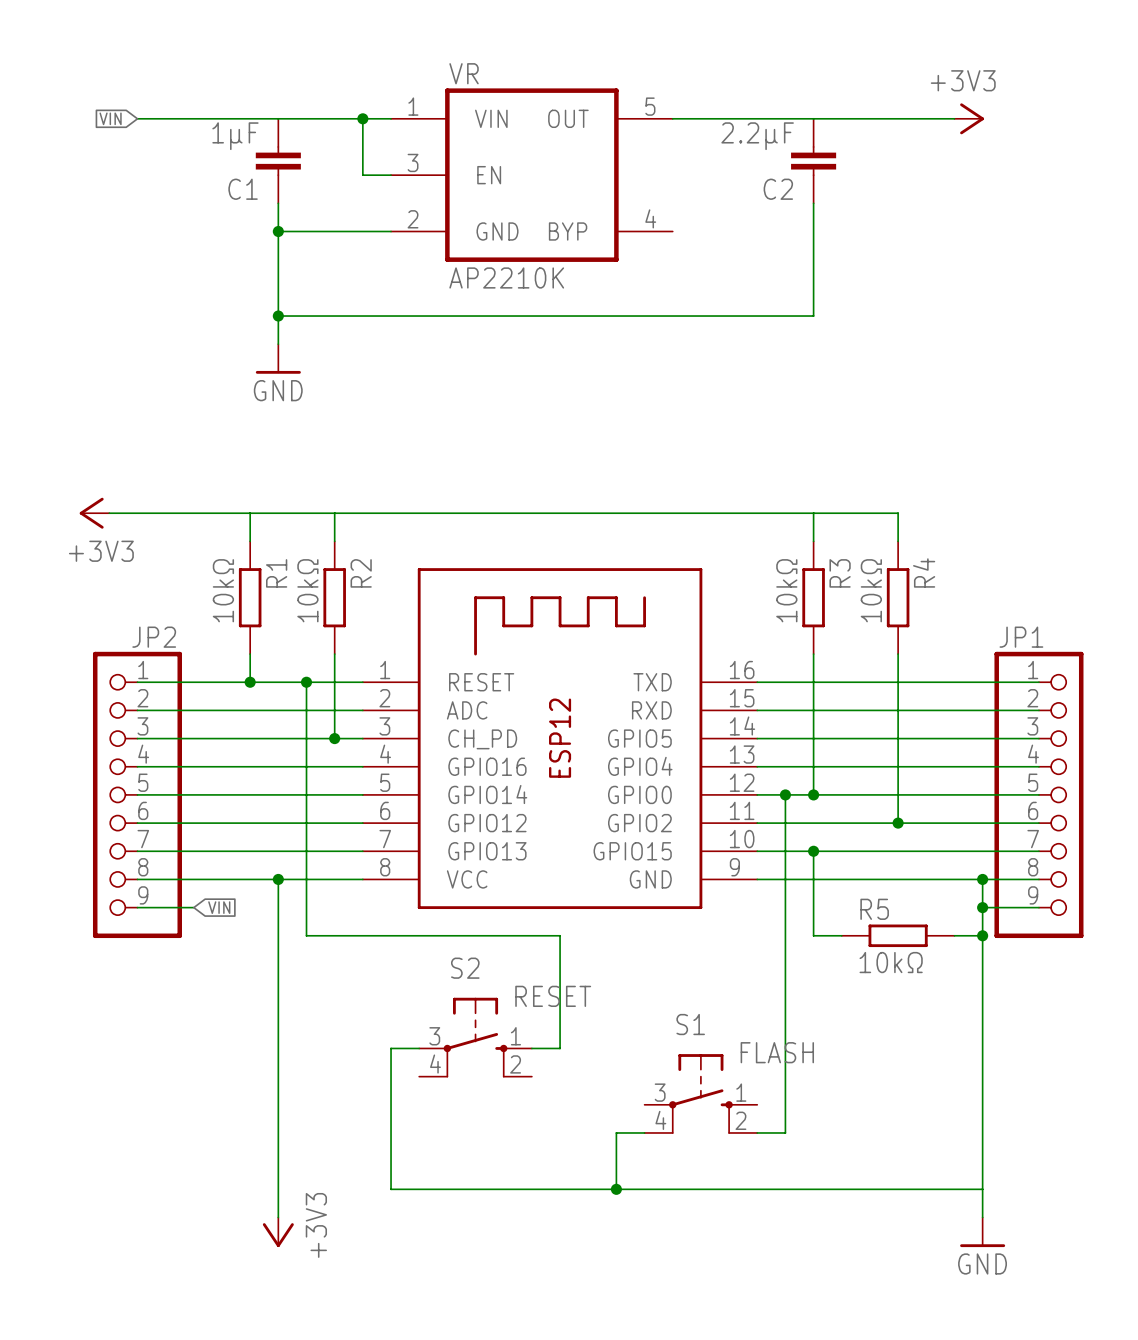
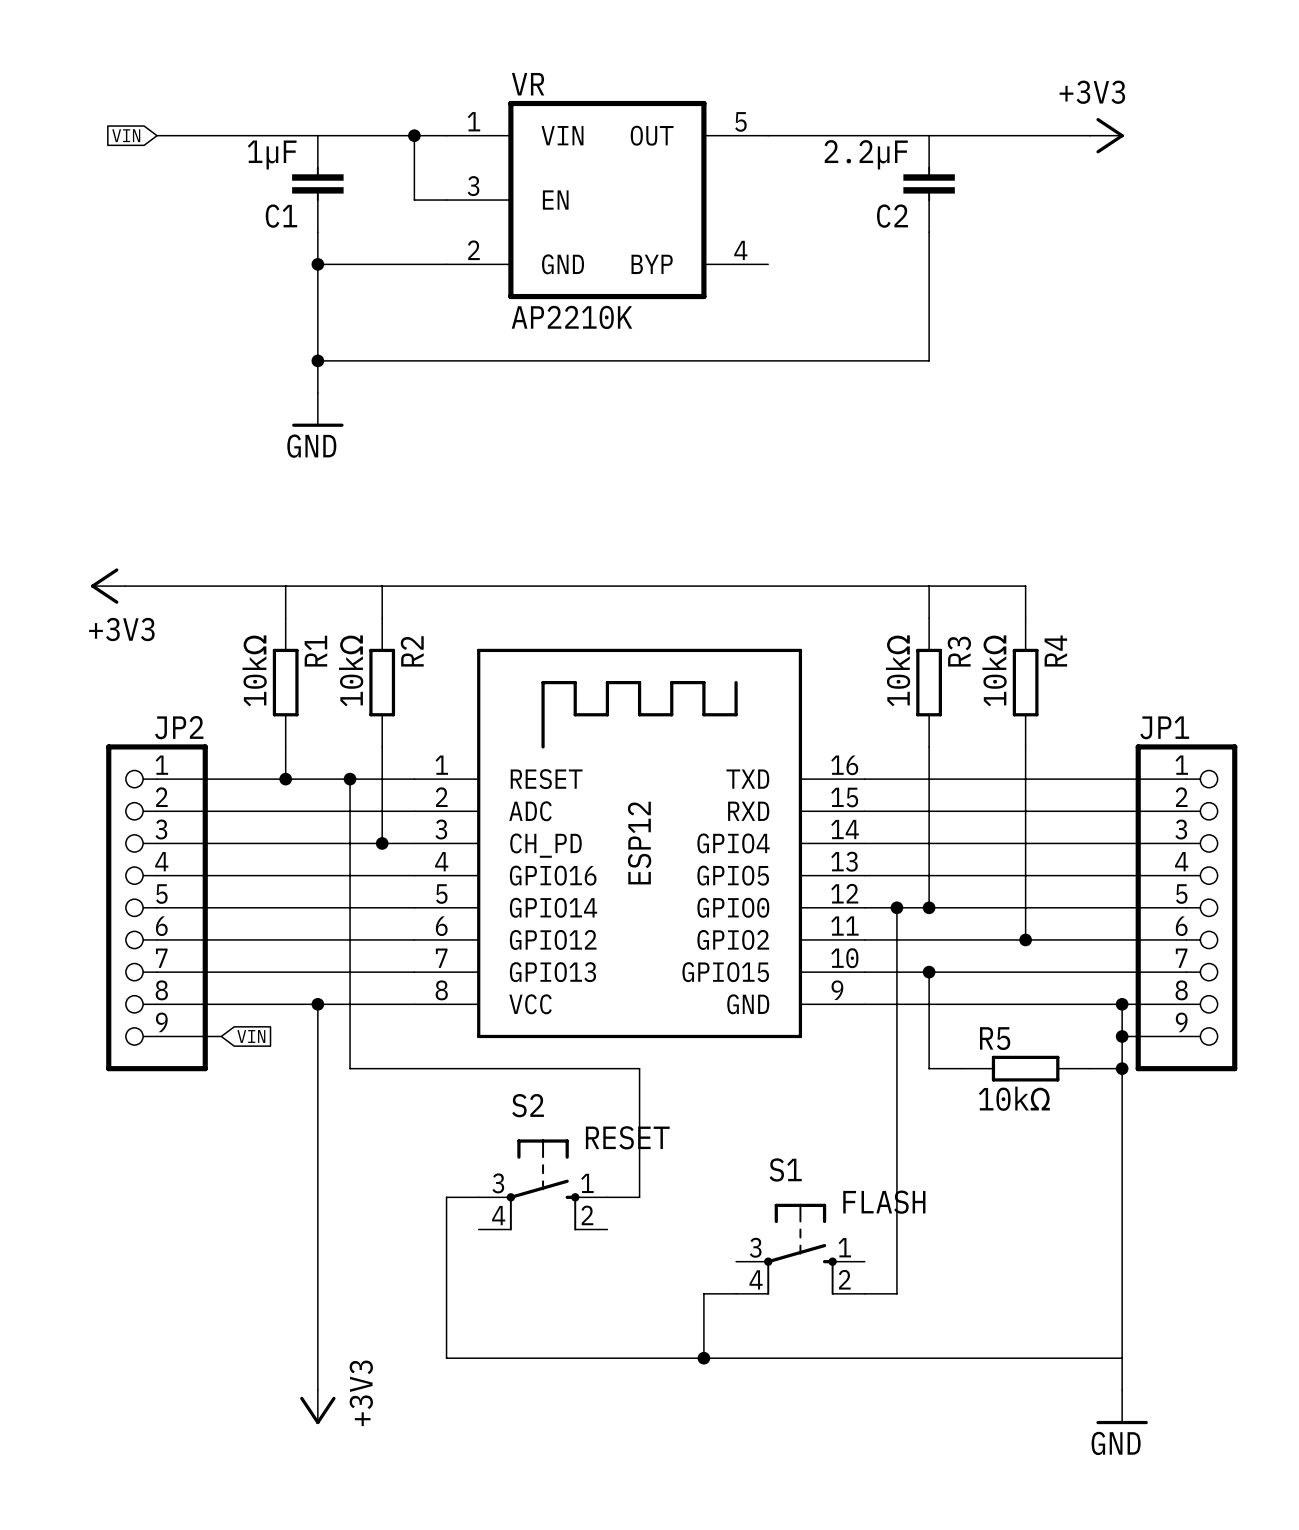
part pin name: GPIO5 (639, 738) -> GPIO4 (733, 843)
part pin name: GPIO4 (640, 766) -> GPIO5 (733, 875)

